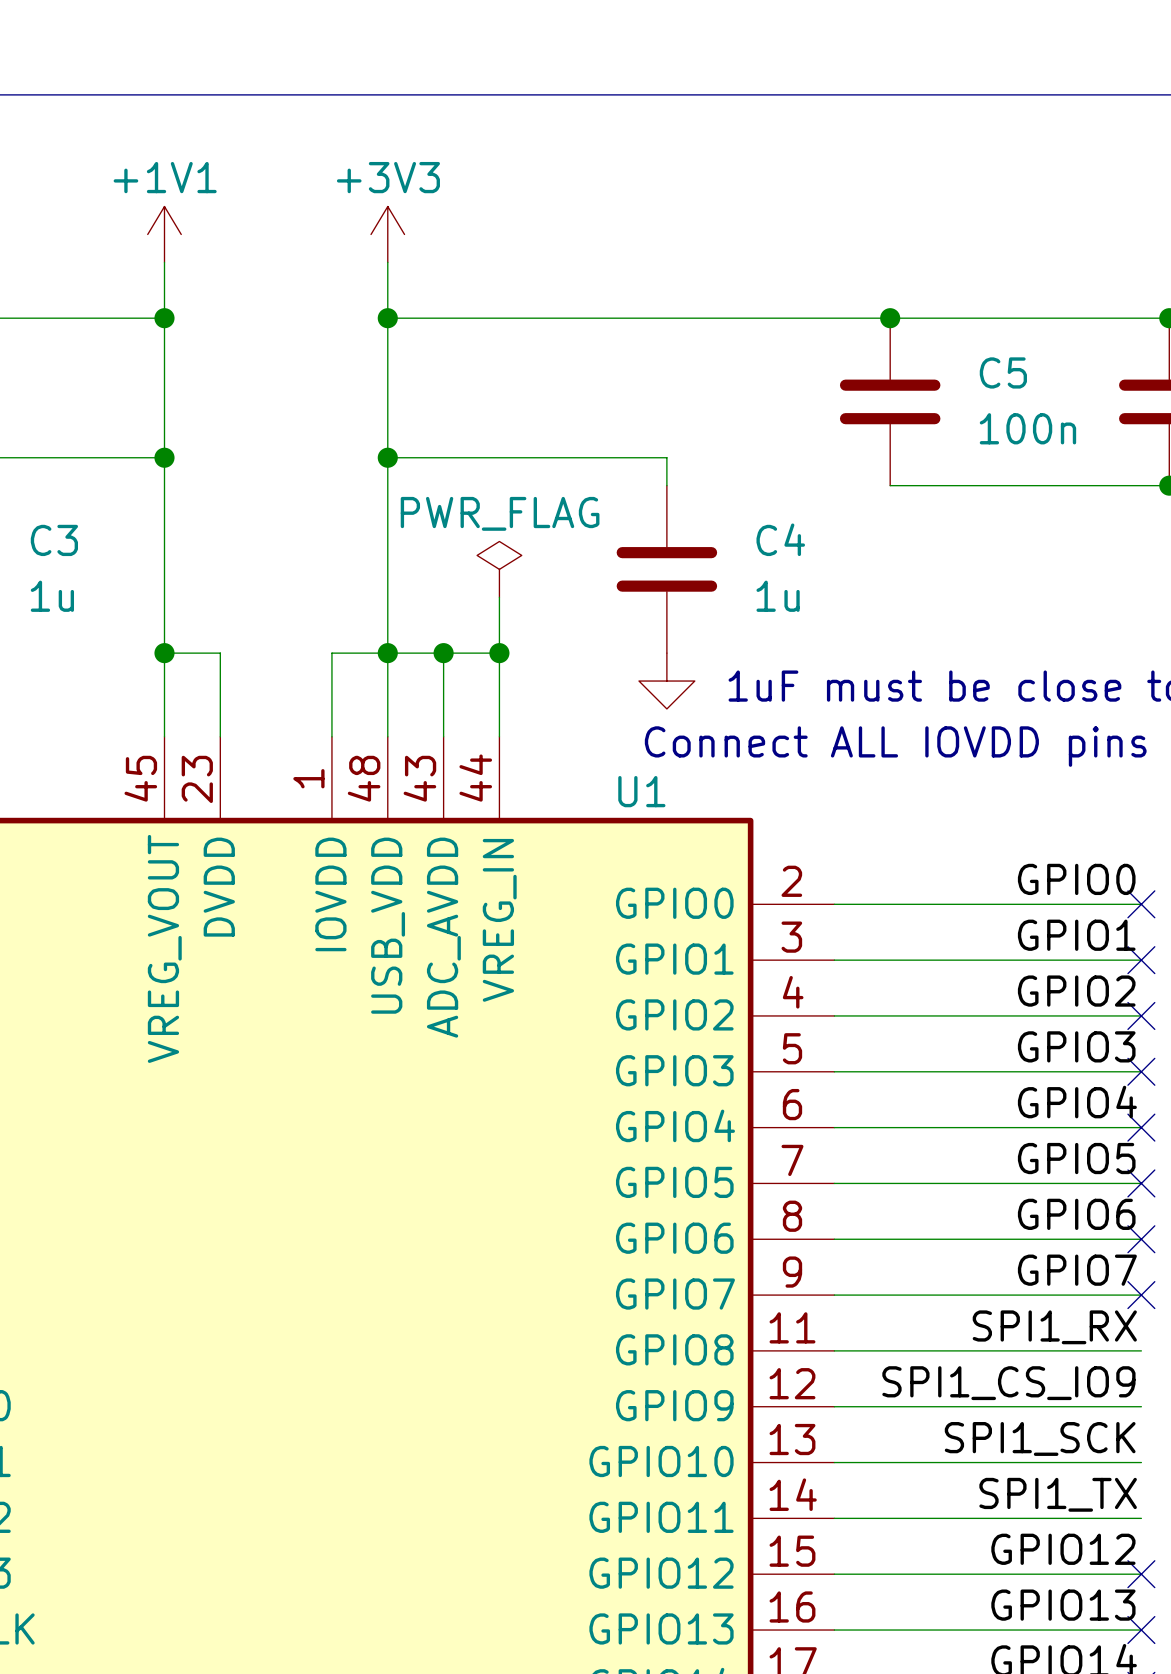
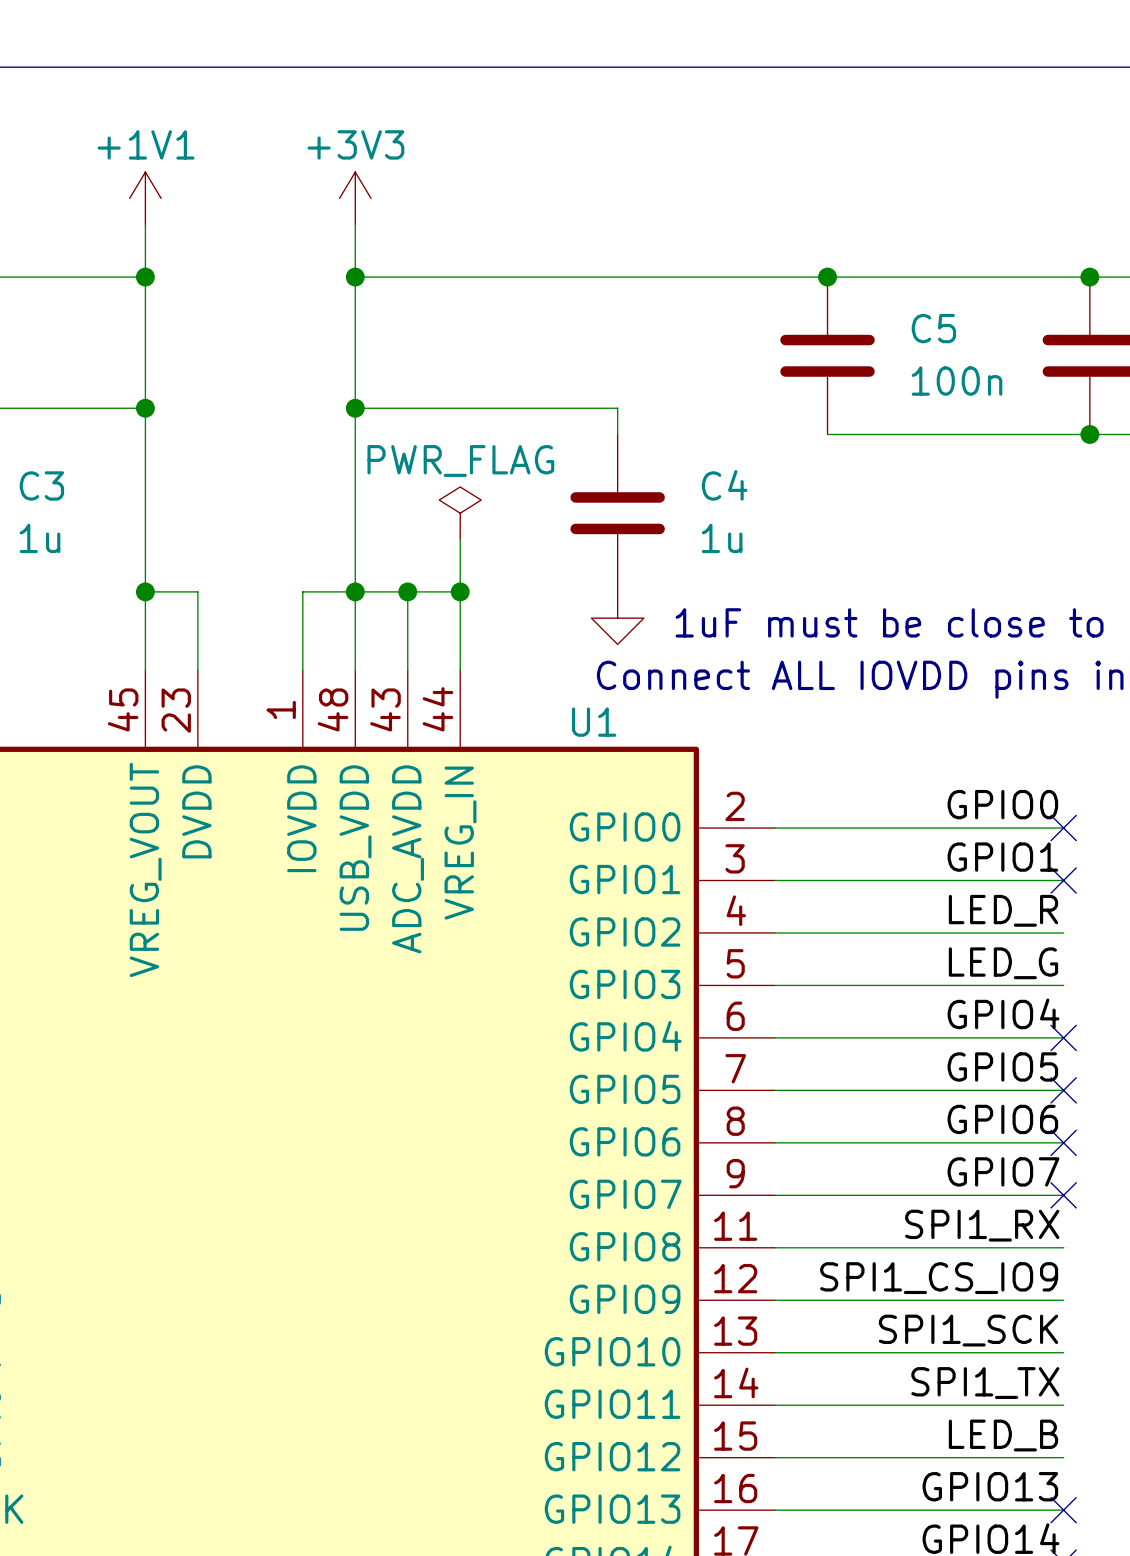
label: GPIO2 (1076, 991) -> LED_R (1003, 910)
no-connect mark: (1141, 1015) -> none
label: GPIO3 (1076, 1046) -> LED_G (1003, 963)
no-connect mark: (1141, 1071) -> none
label: GPIO12 (1063, 1549) -> LED_B (1003, 1435)
no-connect mark: (1141, 1574) -> none

